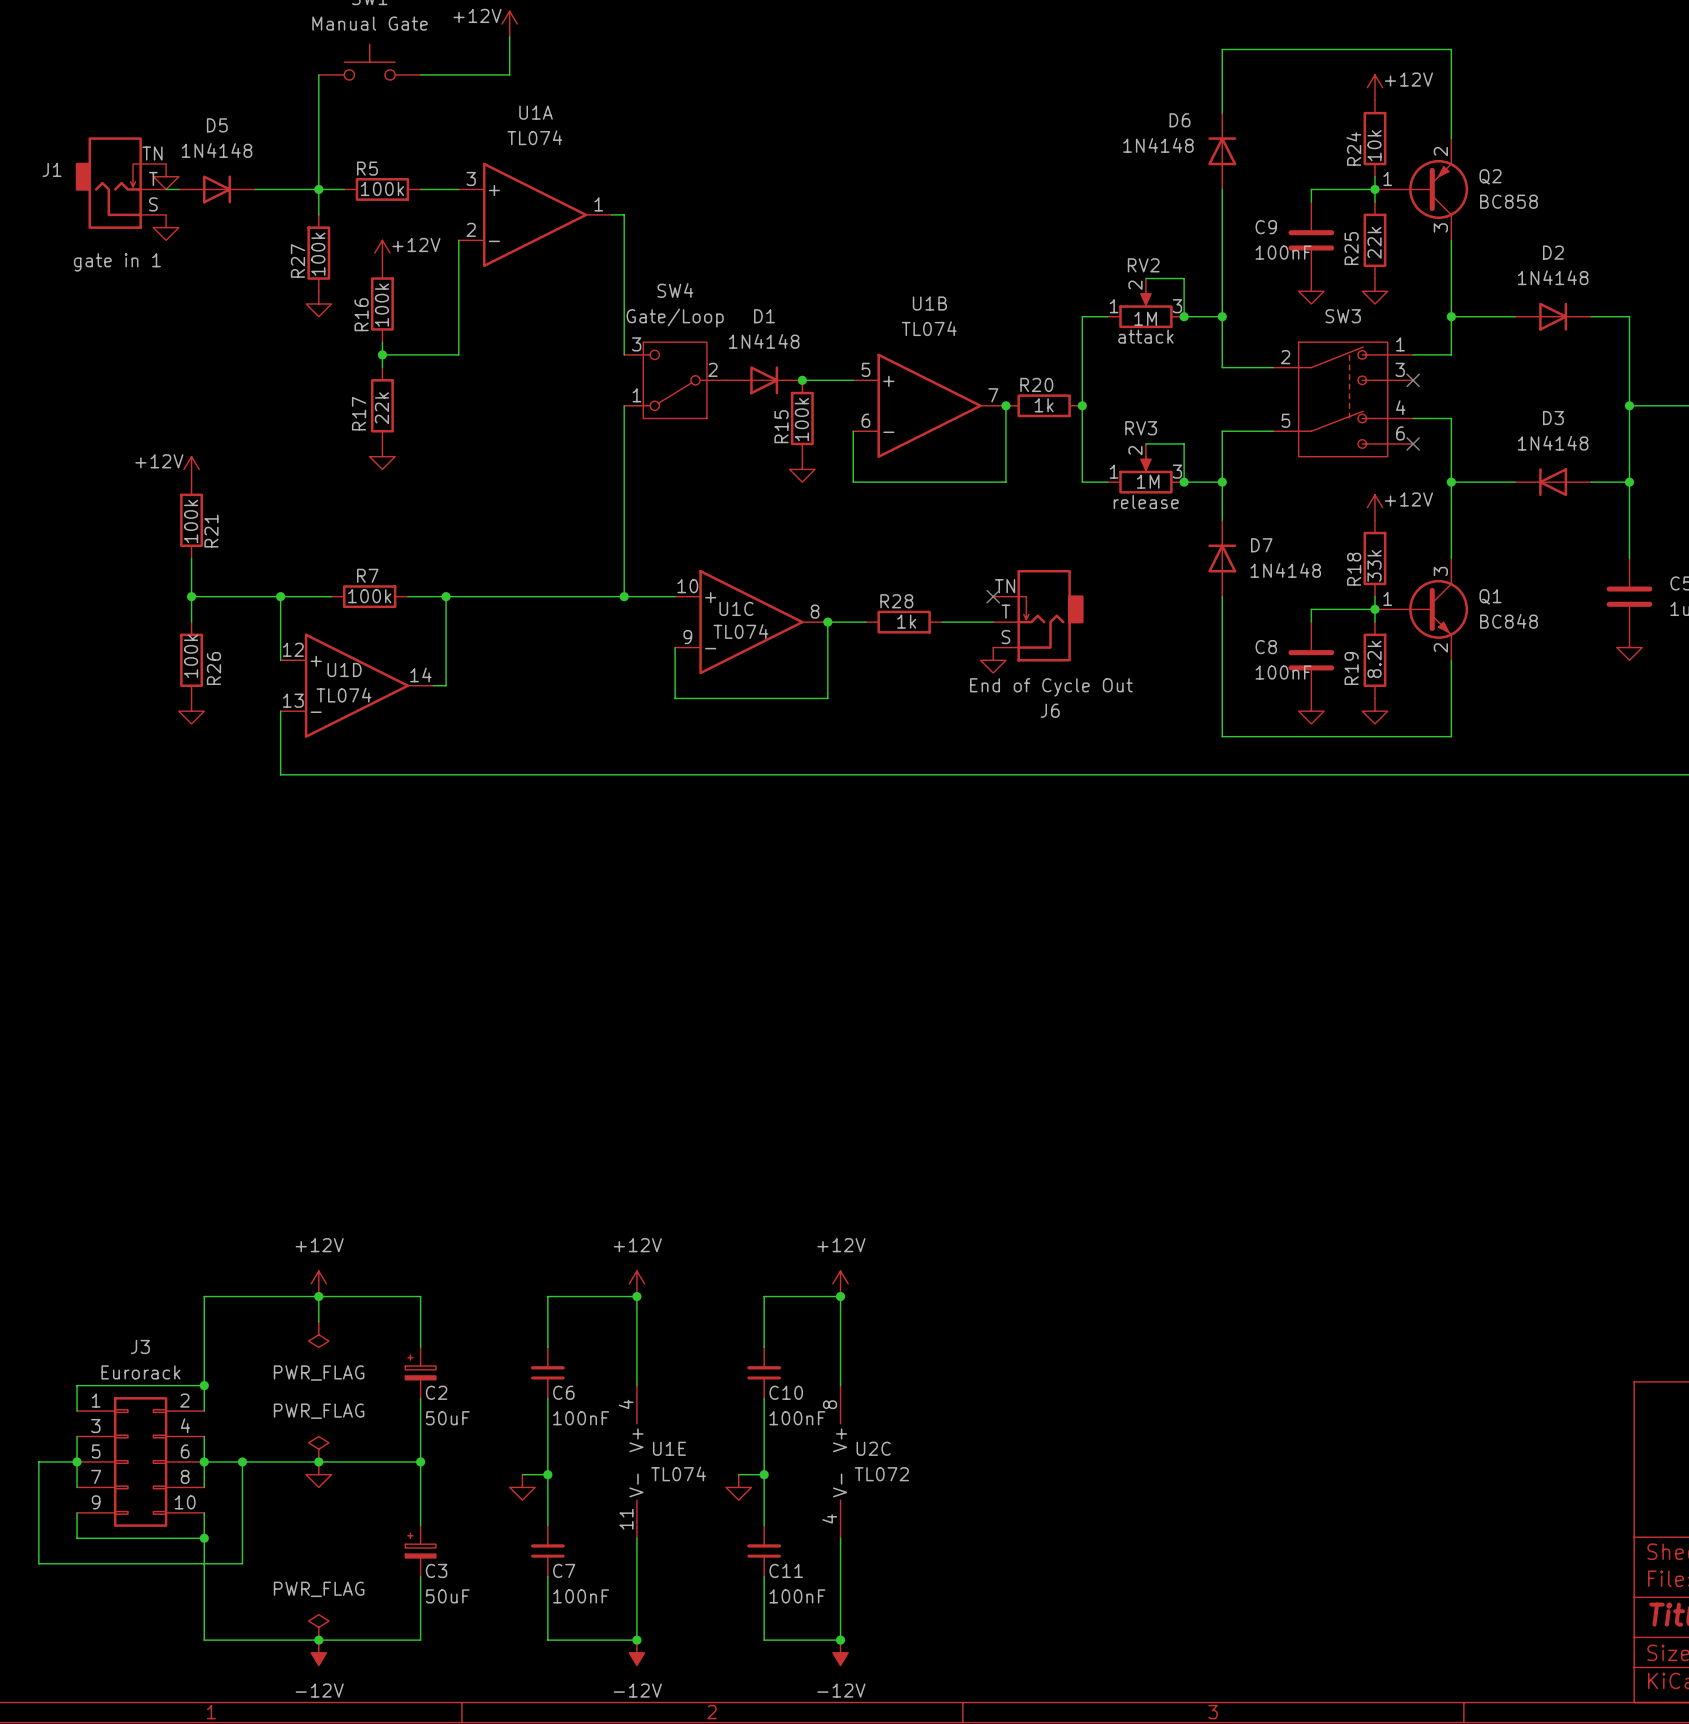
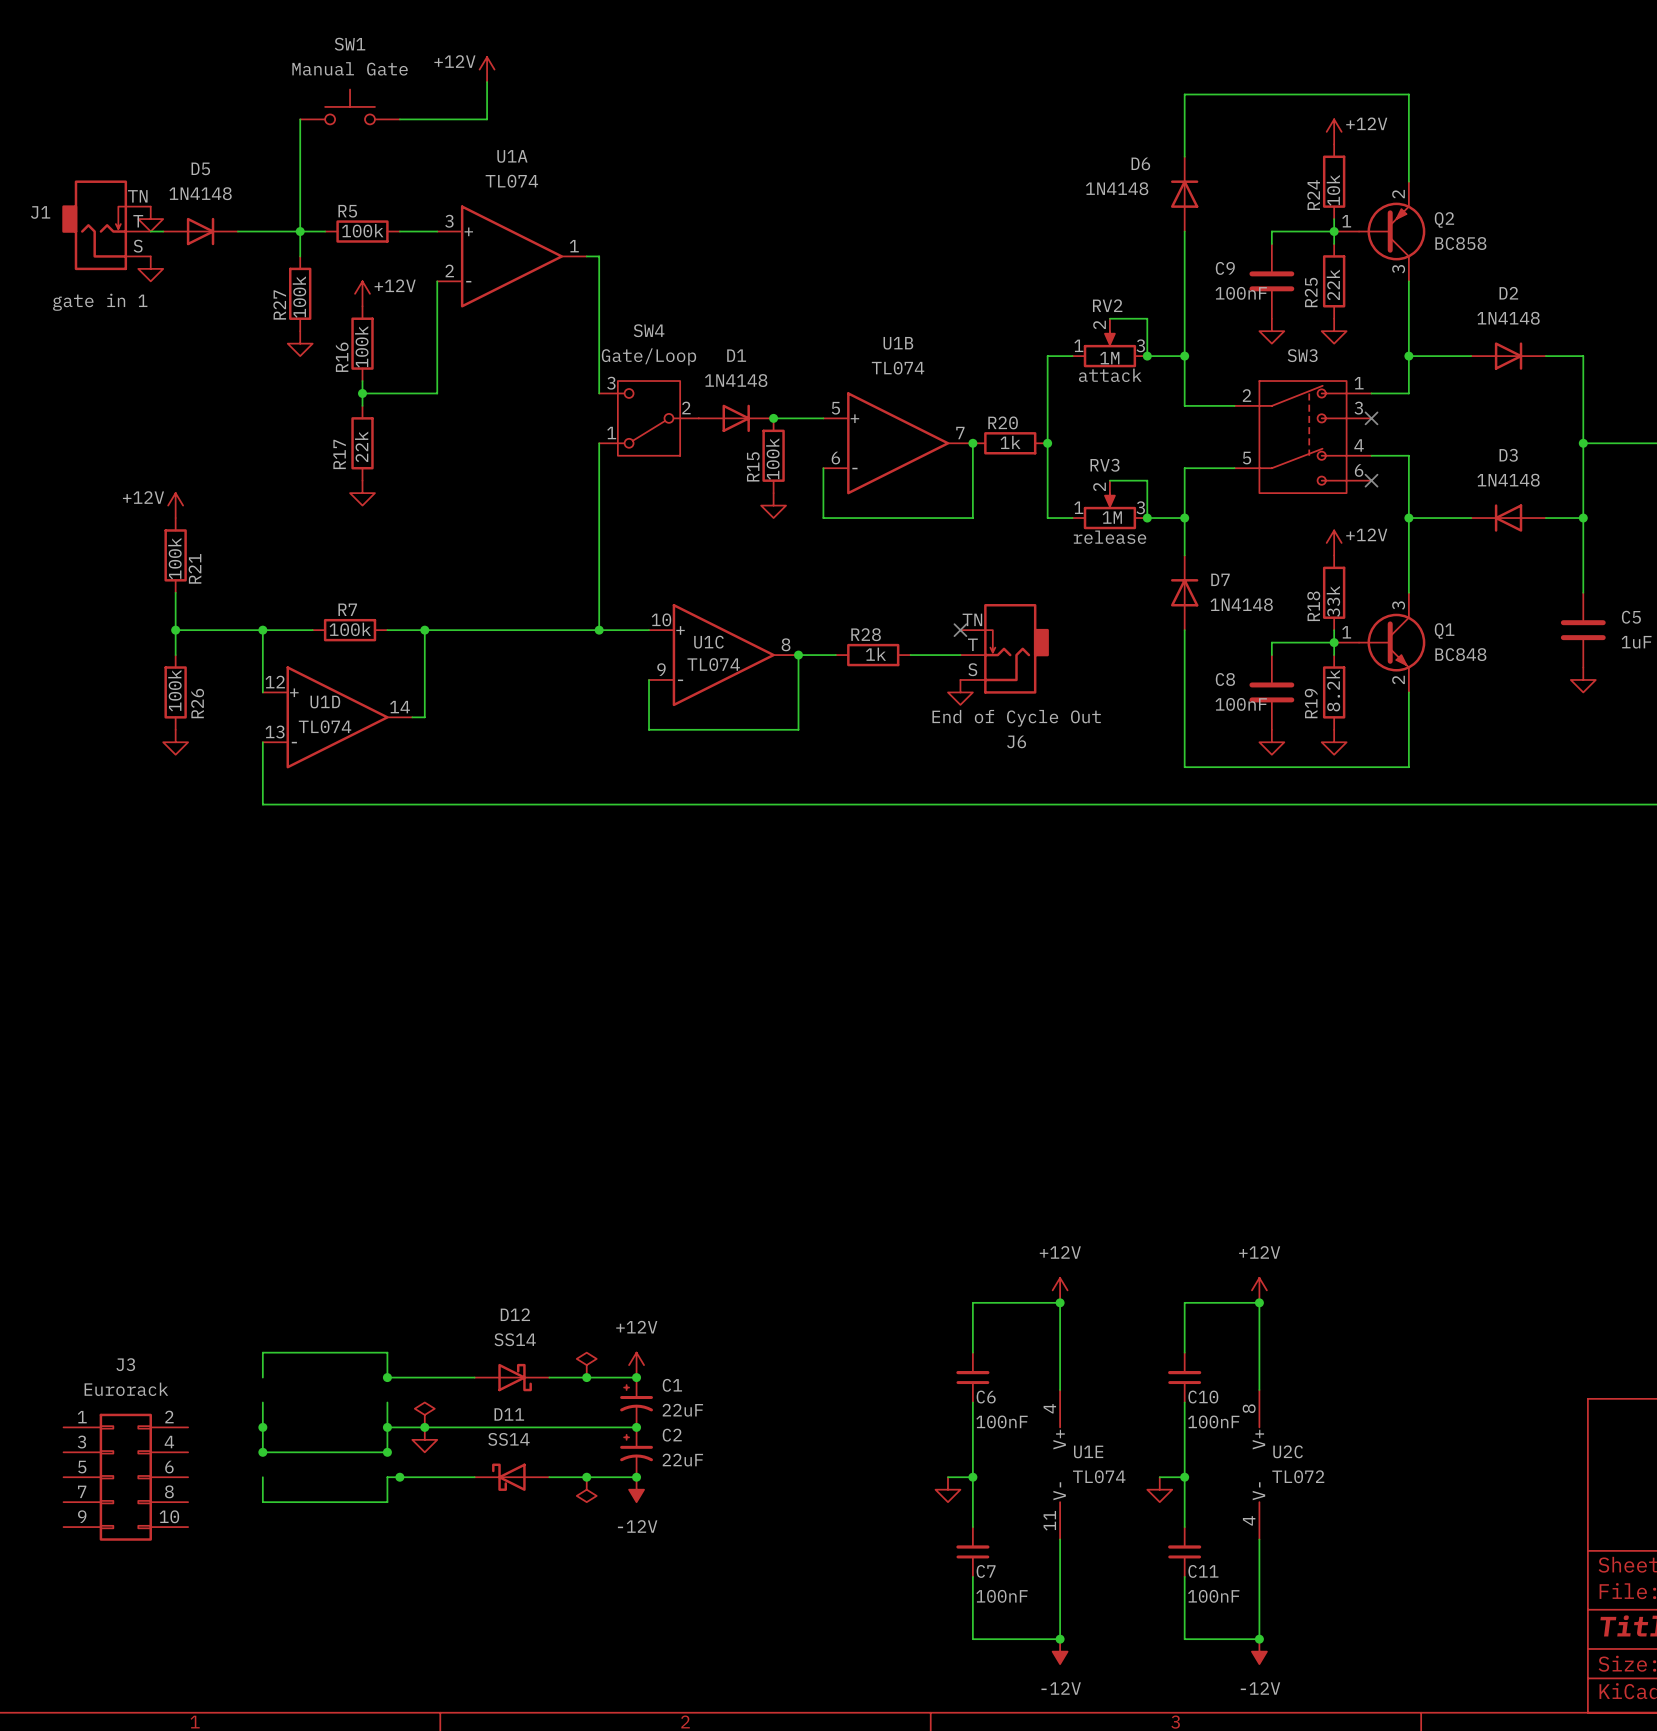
power symbol: none -> +12V (1060, 1290)
power symbol: none -> +12V (1259, 1290)
power symbol: +12V (318, 1283) -> none
power symbol position: +12V (636, 1283) -> +12V (636, 1365)
power symbol: +12V (840, 1283) -> none
junction: none -> (1060, 1302)
junction: none -> (1259, 1302)
wire: (318, 1296) (318, 1321) -> none
junction: (318, 1296) -> none
junction: (636, 1296) -> none
junction: (840, 1296) -> none
power symbol: PWR_FLAG (318, 1334) -> none
wire: none -> (972, 1352) (972, 1302) (1060, 1302) (1060, 1390)
wire: none -> (1184, 1352) (1184, 1302) (1259, 1302) (1259, 1390)
C2 symbol: [405, 1347, 436, 1399] -> [620, 1427, 654, 1478]
wire: (420, 1347) (420, 1296) (204, 1296) (204, 1411) -> none
wire: (547, 1347) (547, 1296) (636, 1296) (636, 1385) -> none
power symbol: none -> (586, 1365)
wire: (764, 1347) (764, 1296) (840, 1296) (840, 1385) -> none
wire: none -> (262, 1377) (262, 1352) (387, 1352) (387, 1377) (474, 1377)
junction: none -> (387, 1377)
D12: none -> SS14 (511, 1377)
wire: none -> (549, 1377) (636, 1377)
junction: none -> (586, 1377)
junction: none -> (636, 1377)
C6 position: (547, 1372) -> (972, 1377)
C10 position: (764, 1372) -> (1184, 1377)
wire: (204, 1385) (77, 1385) (77, 1411) -> none
junction: (204, 1385) -> none
wire: none -> (262, 1402) (262, 1452) (387, 1452) (387, 1402)
C1: none -> 22uF (636, 1402)
wire: none -> (1184, 1402) (1184, 1527)
C2 name position: C2 (436, 1392) -> C2 (672, 1435)
wire: (420, 1398) (420, 1525) -> none
power symbol: none -> (424, 1414)
wire: (547, 1398) (547, 1525) -> none
wire: (764, 1398) (764, 1525) -> (972, 1402) (972, 1527)
junction: none -> (262, 1427)
wire: none -> (387, 1427) (636, 1427)
junction: none -> (387, 1427)
junction: none -> (424, 1427)
junction: none -> (636, 1427)
C2 value: 50uF (447, 1418) -> 22uF (682, 1460)
power symbol: none -> (424, 1439)
wire: (77, 1436) (77, 1487) -> none
wire: (204, 1436) (204, 1487) -> none
junction: none -> (262, 1452)
junction: none -> (387, 1452)
power symbol: PWR_FLAG (318, 1449) -> none
wire: (77, 1461) (38, 1461) (38, 1563) (242, 1563) (242, 1461) -> none
junction: (77, 1461) -> none
wire: (204, 1461) (407, 1461) -> (262, 1477) (262, 1502) (387, 1502) (387, 1477)
junction: (204, 1461) -> none
junction: (242, 1461) -> none
junction: (318, 1461) -> none
wire: none -> (399, 1477) (474, 1477)
D11: none -> SS14 (511, 1477)
wire: none -> (549, 1477) (636, 1477)
junction: none -> (586, 1477)
U1E position: (636, 1461) -> (1060, 1464)
junction: none -> (636, 1477)
U2C position: (840, 1461) -> (1259, 1464)
junction: none -> (972, 1477)
wire: none -> (1159, 1477) (1184, 1477)
junction: none -> (1184, 1477)
power symbol: (318, 1474) -> none
wire: (522, 1474) (547, 1474) -> none
junction: (547, 1474) -> none
power symbol: none -> (586, 1489)
power symbol: none -> -12V (636, 1489)
wire: (738, 1474) (764, 1474) -> (947, 1477) (972, 1477)
junction: (764, 1474) -> none
power symbol: none -> (947, 1489)
power symbol: none -> (1159, 1489)
power symbol: (522, 1487) -> none
power symbol: (738, 1487) -> none
wire: (77, 1512) (77, 1538) (204, 1538) -> none
wire: (204, 1512) (204, 1640) (420, 1640) (420, 1576) -> none
wire: none -> (1060, 1539) (1060, 1639) (972, 1639) (972, 1576)
wire: none -> (1259, 1539) (1259, 1639) (1184, 1639) (1184, 1576)
junction: (204, 1538) -> none
wire: (636, 1538) (636, 1640) (547, 1640) (547, 1576) -> none
wire: (840, 1538) (840, 1640) (764, 1640) (764, 1576) -> none
C3: 50uF (420, 1551) -> none
C7 position: (547, 1551) -> (972, 1551)
C11 position: (764, 1551) -> (1184, 1551)
power symbol: PWR_FLAG (318, 1627) -> none
junction: none -> (1060, 1639)
junction: none -> (1259, 1639)
junction: (318, 1640) -> none
junction: (636, 1640) -> none
junction: (840, 1640) -> none
power symbol: none -> -12V (1060, 1651)
power symbol: none -> -12V (1259, 1651)
power symbol: -12V (318, 1652) -> none
power symbol: -12V (636, 1652) -> none
power symbol: -12V (840, 1652) -> none

